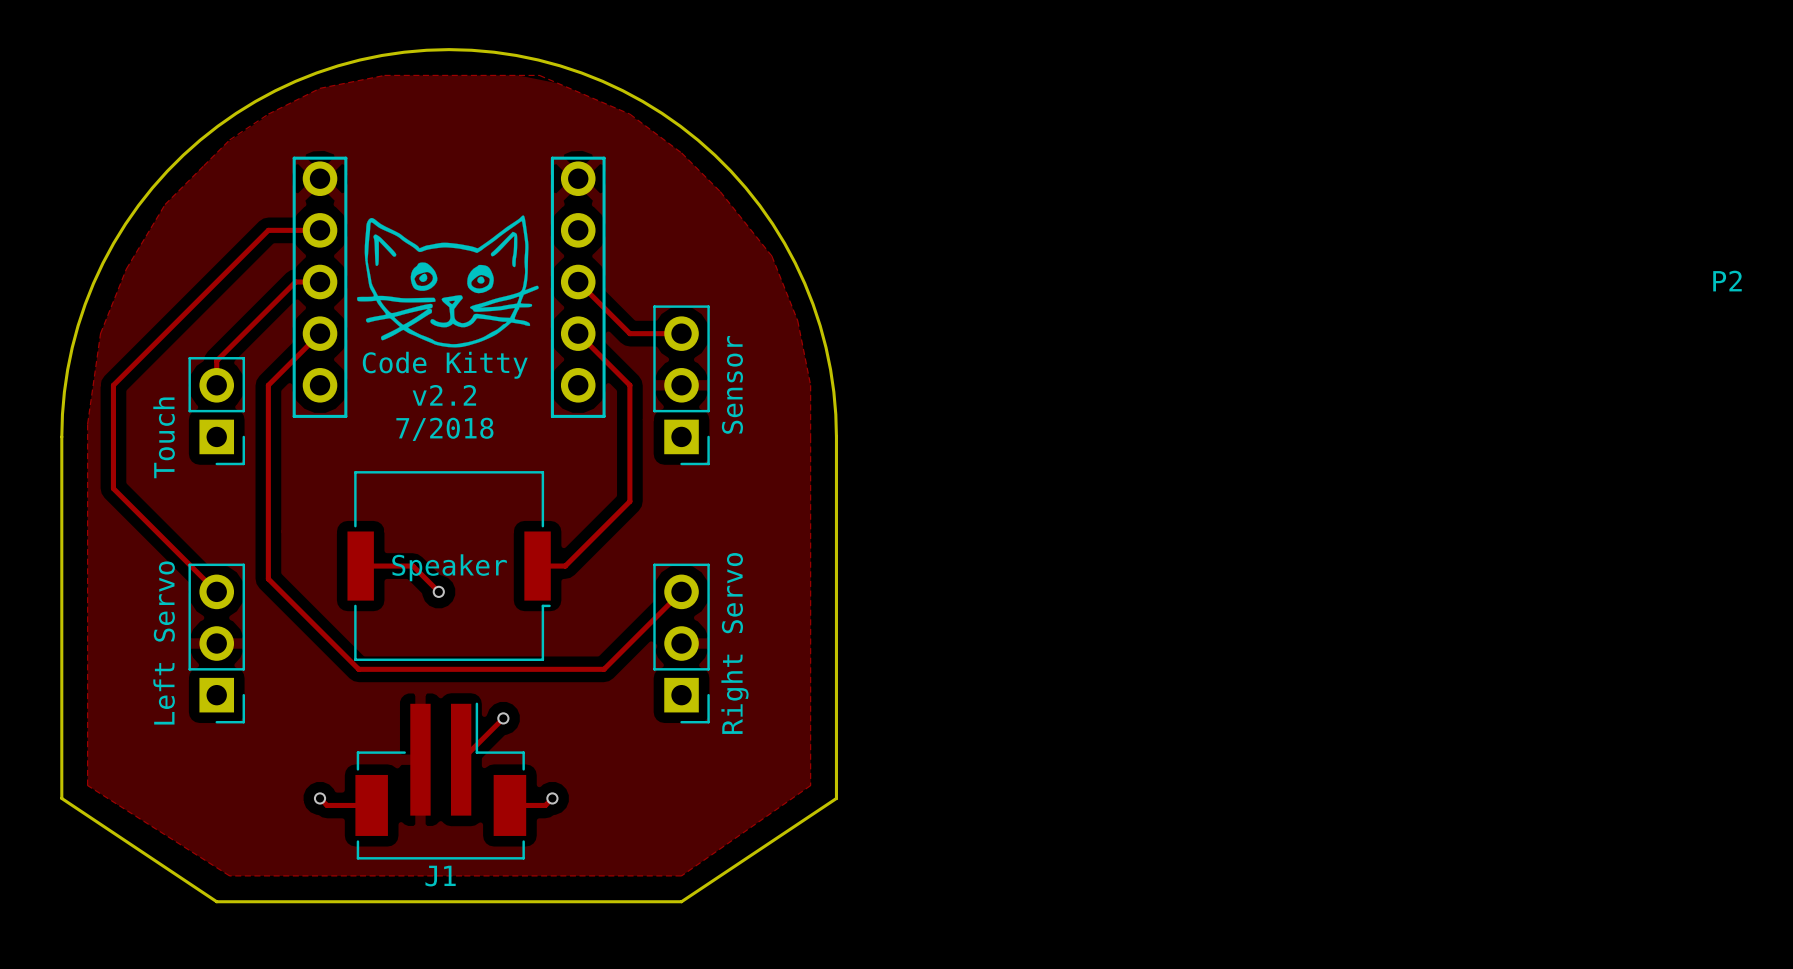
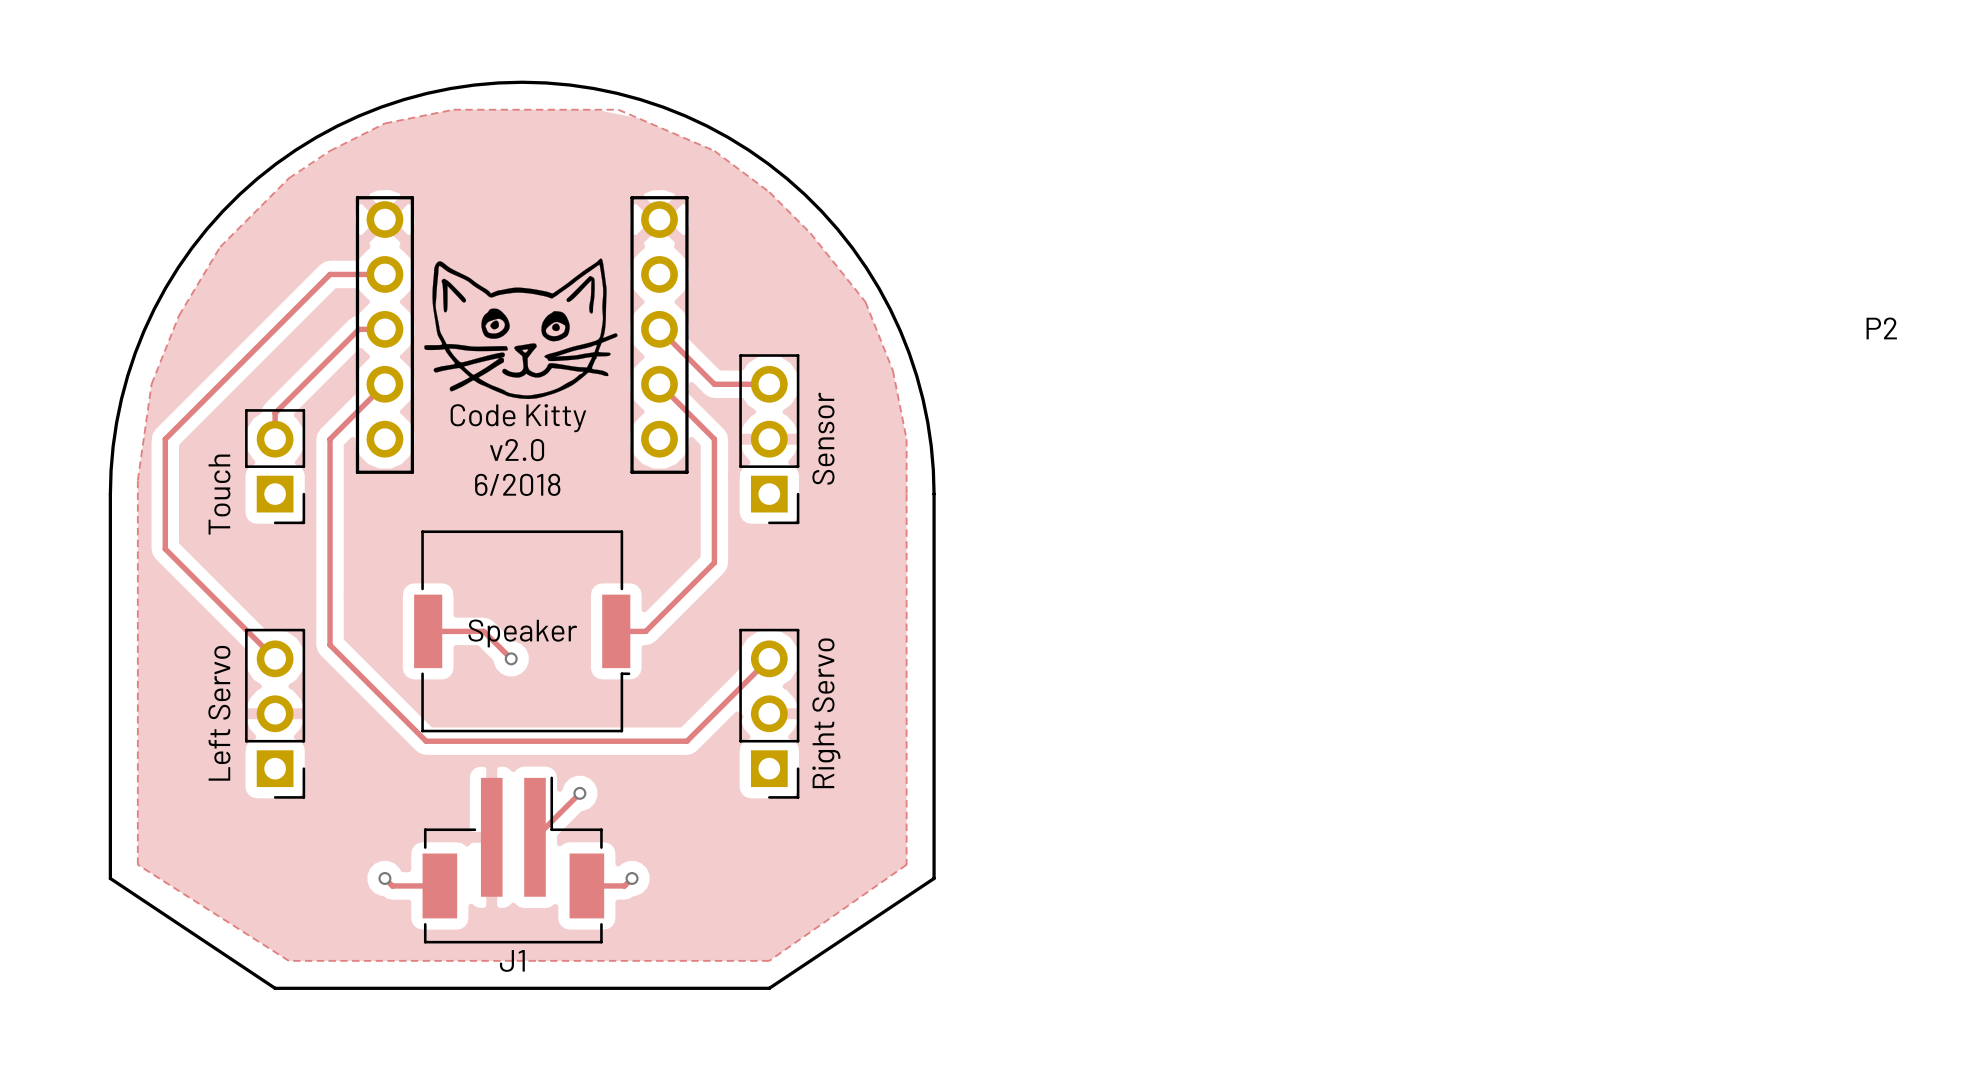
text: v2.2 (444, 395) -> v2.0 (517, 450)
text: 7/2018 (444, 429) -> 6/2018 (517, 484)

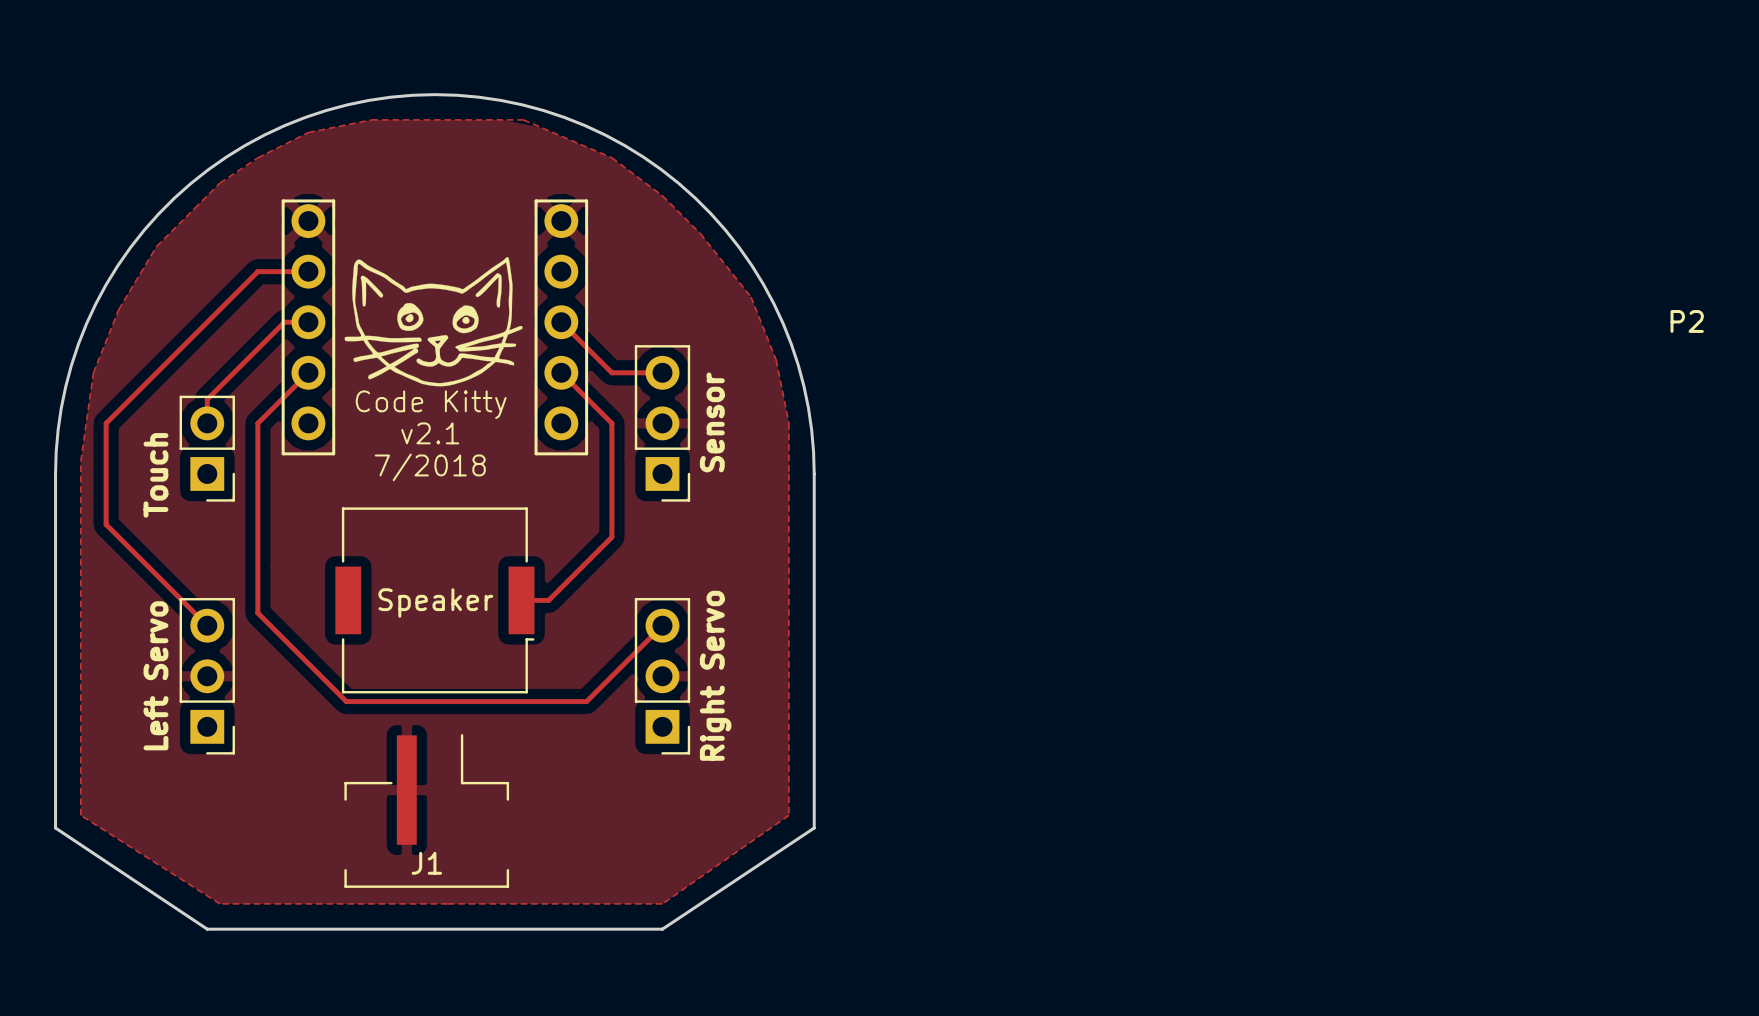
text: v2.0 (517, 450) -> v2.1 (430, 433)
text: 6/2018 (517, 484) -> 7/2018 (430, 467)
track: (428, 631) (483, 631) (511, 658) -> none
via: (511, 658) -> none
J1 footprint: [422, 776, 605, 944] -> [344, 734, 510, 888]
track: (579, 793) (534, 837) -> none
via: (579, 793) -> none
track: (384, 878) (392, 885) (439, 885) -> none
via: (384, 878) -> none
track: (632, 878) (624, 885) (586, 885) -> none
via: (632, 878) -> none
J1 name position: J1 (512, 960) -> J1 (426, 863)

